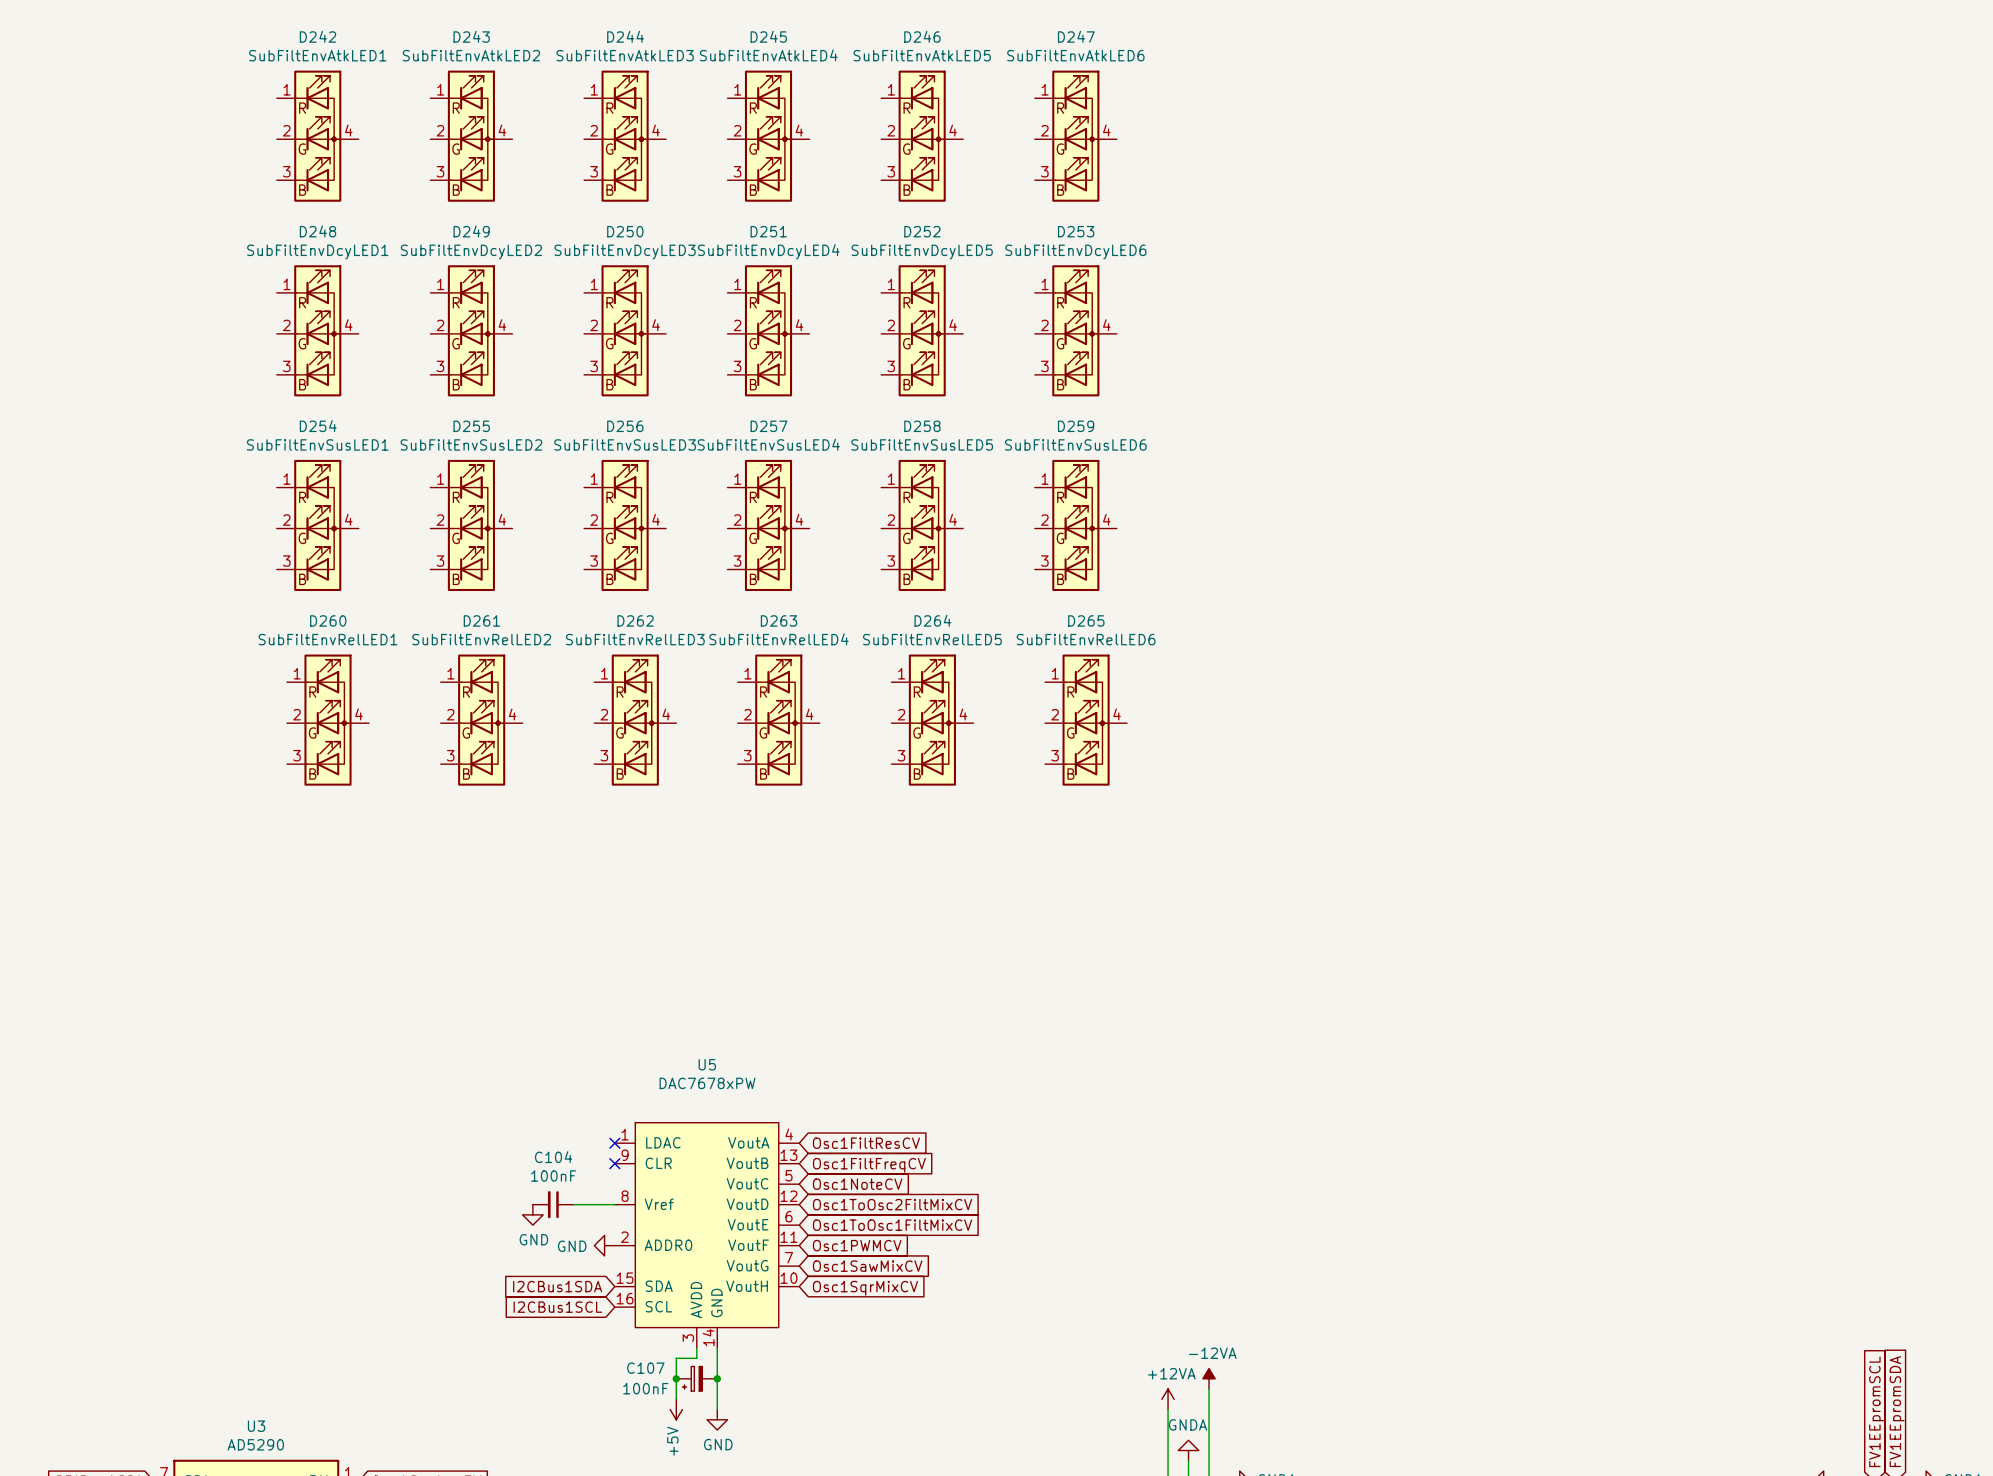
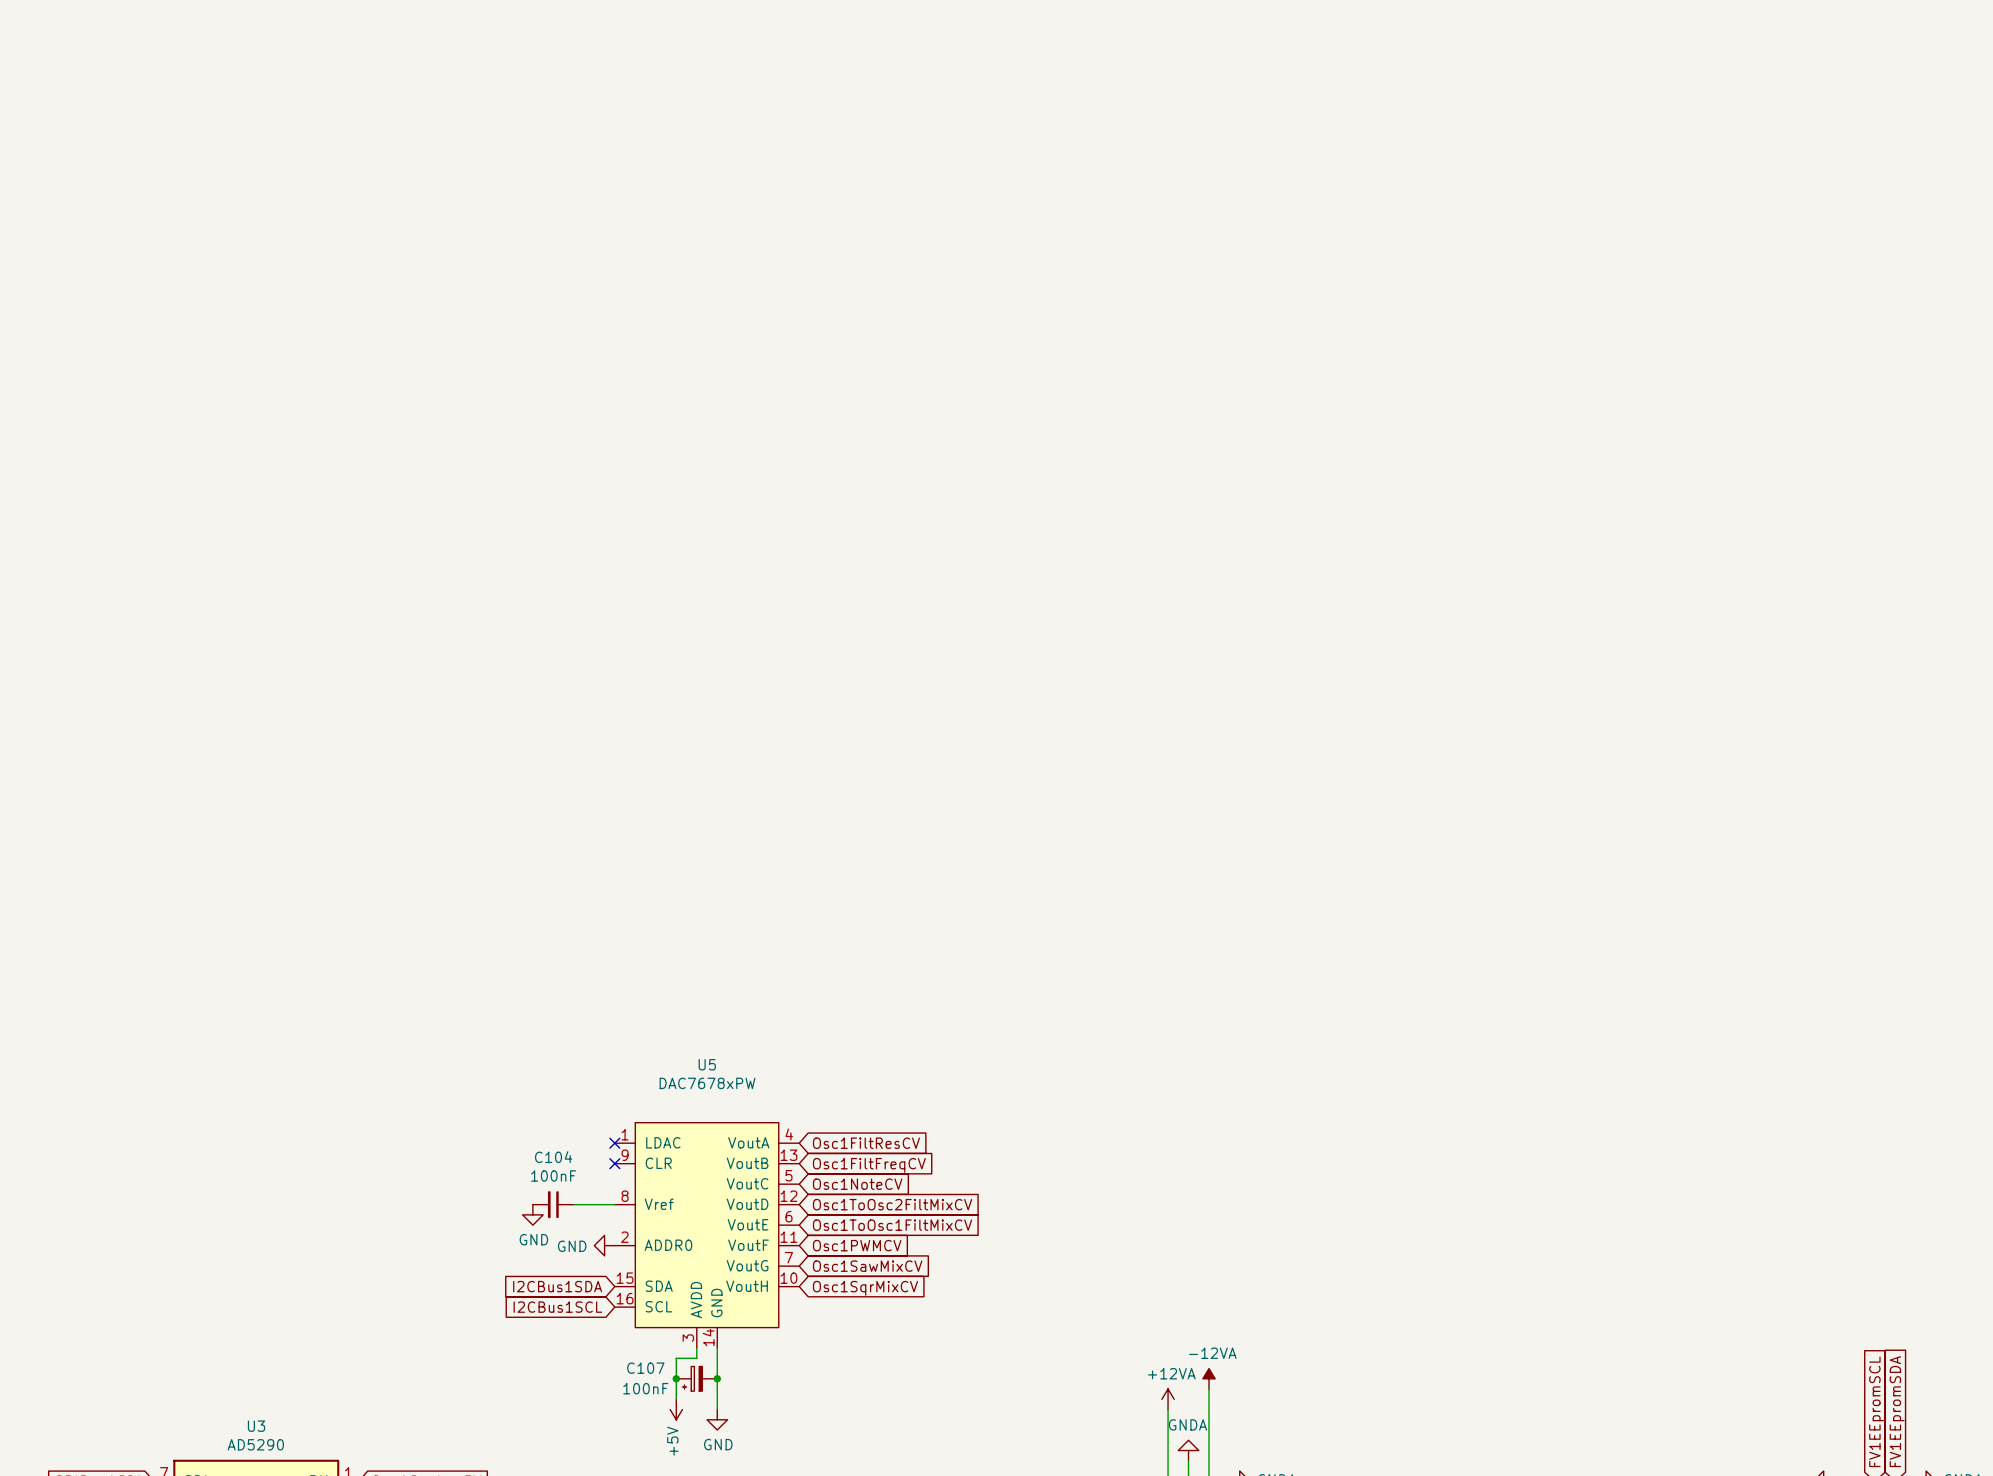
D242: SubFiltEnvAtkLED1 (317, 136) -> none
D243: SubFiltEnvAtkLED2 (471, 136) -> none
D244: SubFiltEnvAtkLED3 (625, 136) -> none
D245: SubFiltEnvAtkLED4 (768, 136) -> none
D246: SubFiltEnvAtkLED5 (922, 136) -> none
D247: SubFiltEnvAtkLED6 (1075, 136) -> none
D248: SubFiltEnvDcyLED1 (317, 330) -> none
D249: SubFiltEnvDcyLED2 (471, 330) -> none
D250: SubFiltEnvDcyLED3 (625, 330) -> none
D251: SubFiltEnvDcyLED4 (768, 330) -> none
D252: SubFiltEnvDcyLED5 (922, 330) -> none
D253: SubFiltEnvDcyLED6 (1075, 330) -> none
D254: SubFiltEnvSusLED1 (317, 525) -> none
D255: SubFiltEnvSusLED2 (471, 525) -> none
D256: SubFiltEnvSusLED3 (625, 525) -> none
D257: SubFiltEnvSusLED4 (768, 525) -> none
D258: SubFiltEnvSusLED5 (922, 525) -> none
D259: SubFiltEnvSusLED6 (1075, 525) -> none
D260: SubFiltEnvRelLED1 (327, 720) -> none
D261: SubFiltEnvRelLED2 (481, 720) -> none
D262: SubFiltEnvRelLED3 (635, 720) -> none
D263: SubFiltEnvRelLED4 (778, 720) -> none
D264: SubFiltEnvRelLED5 (932, 720) -> none
D265: SubFiltEnvRelLED6 (1086, 720) -> none

